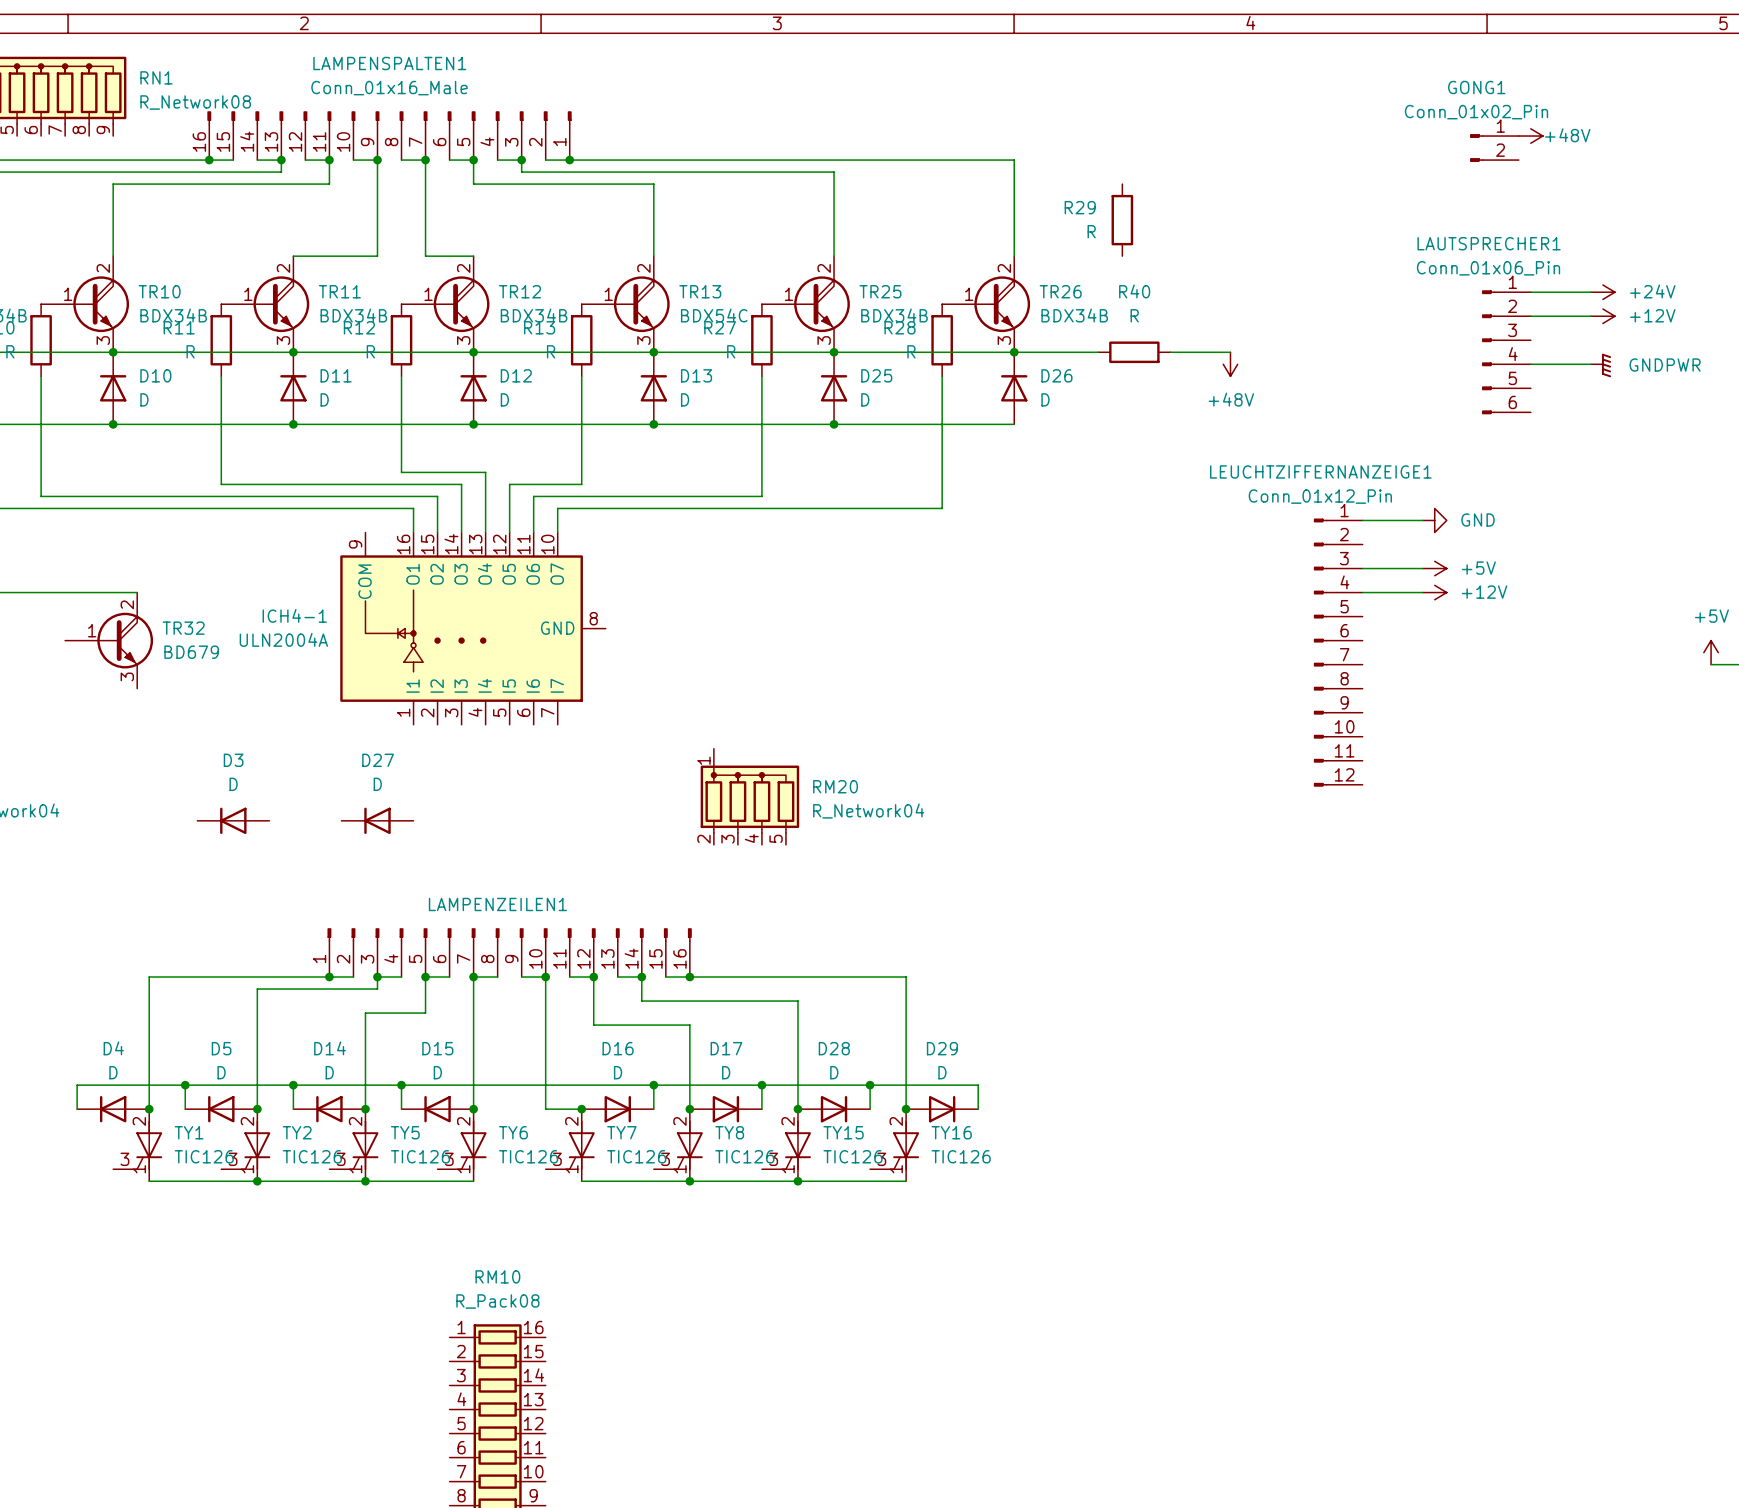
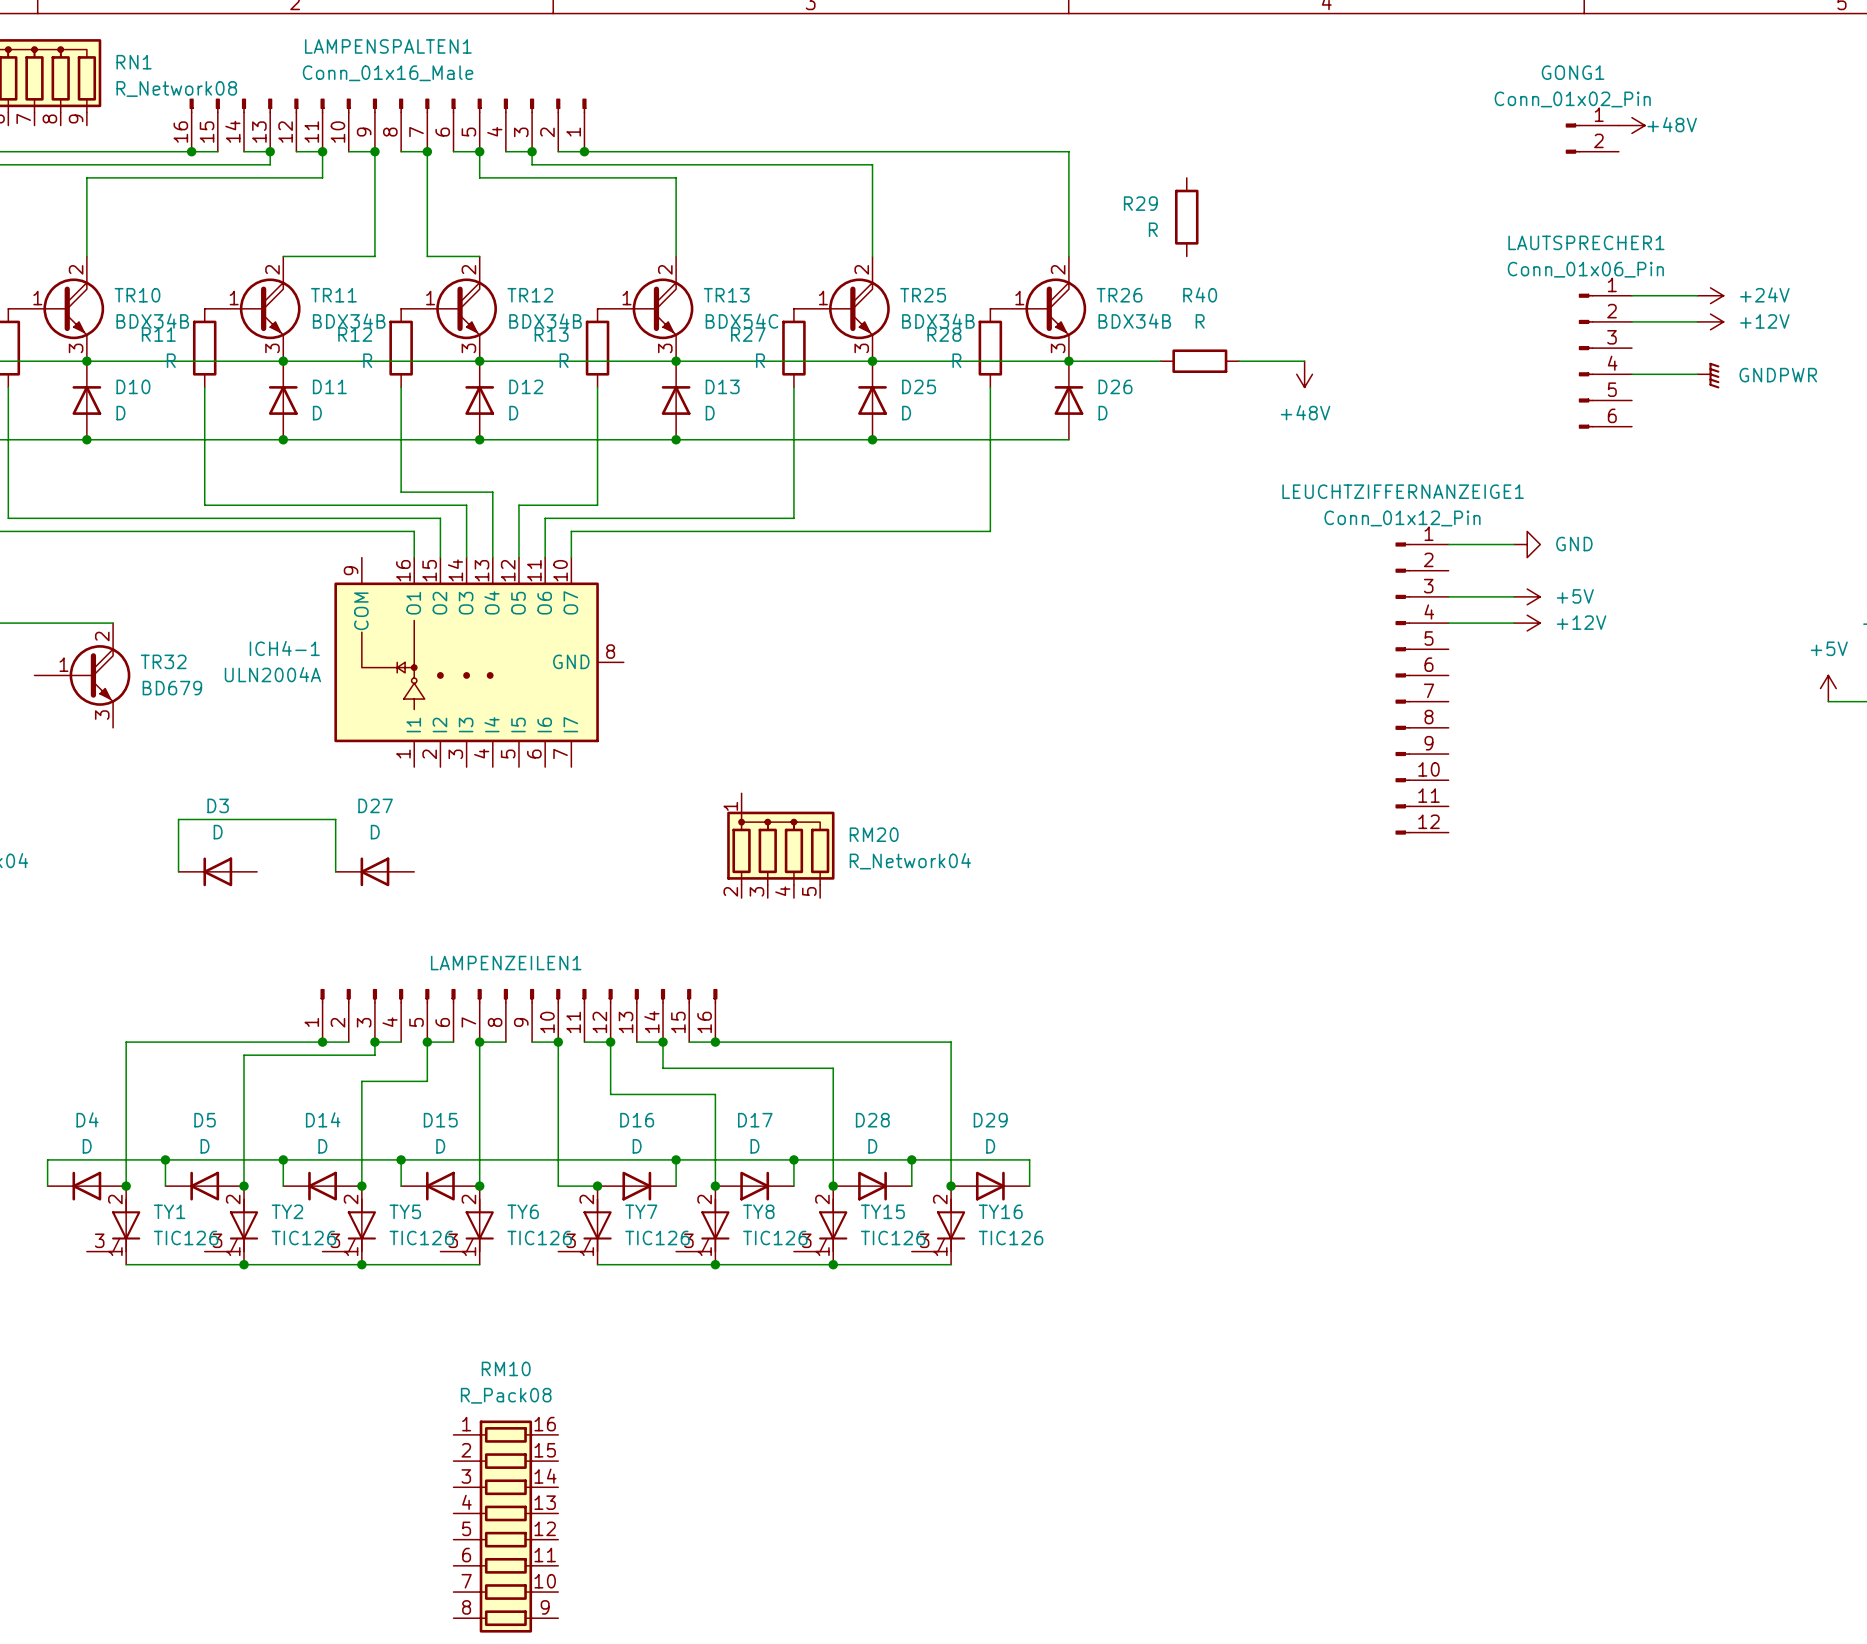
wire: none -> (178, 871) (178, 819) (335, 819) (335, 871)

